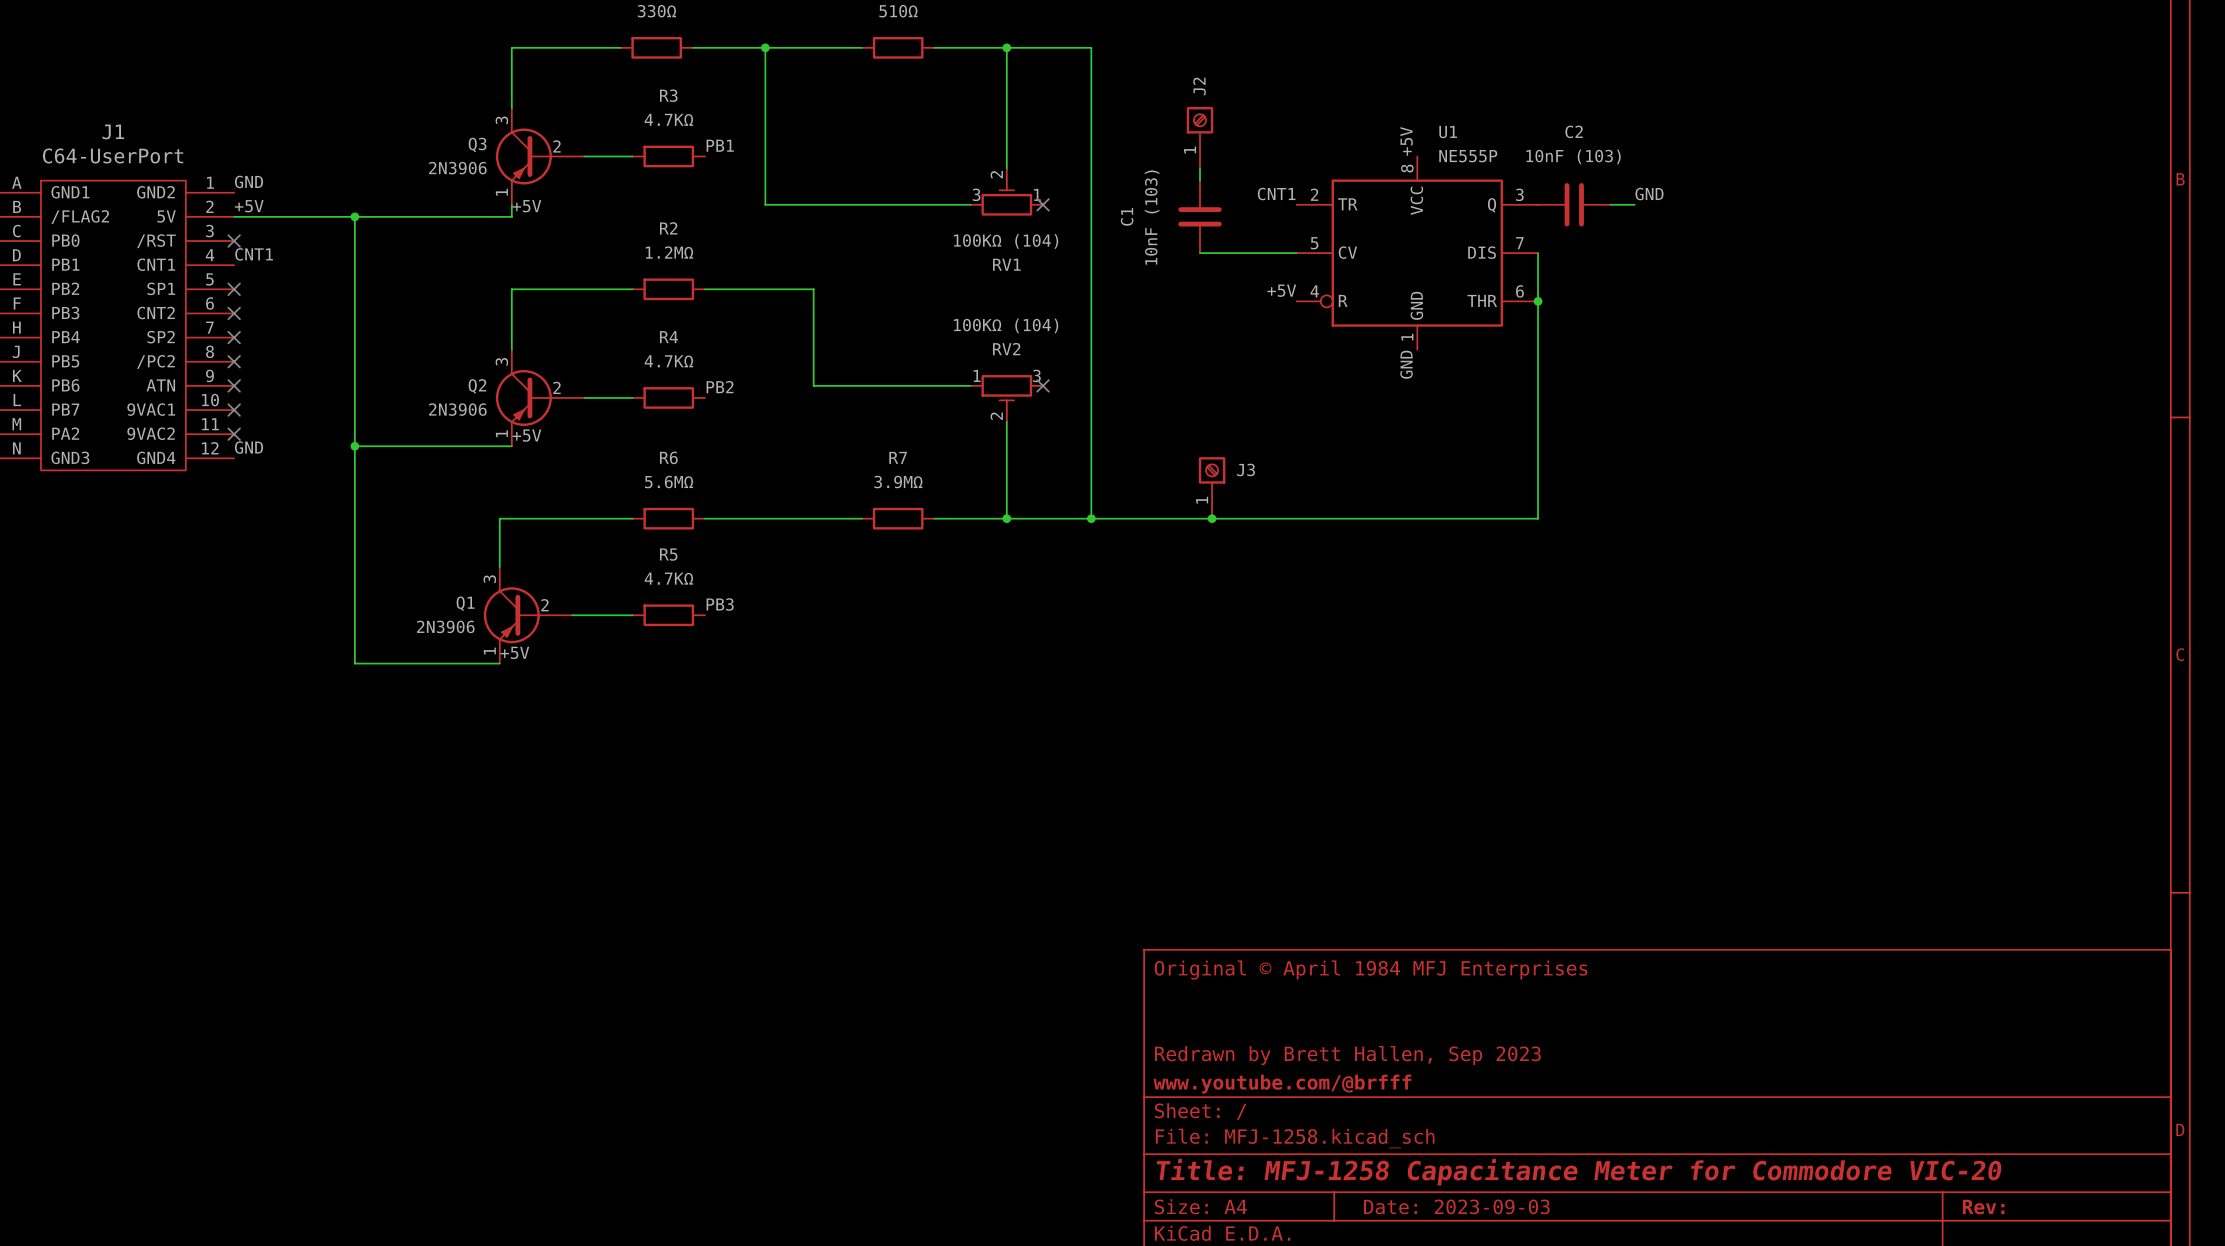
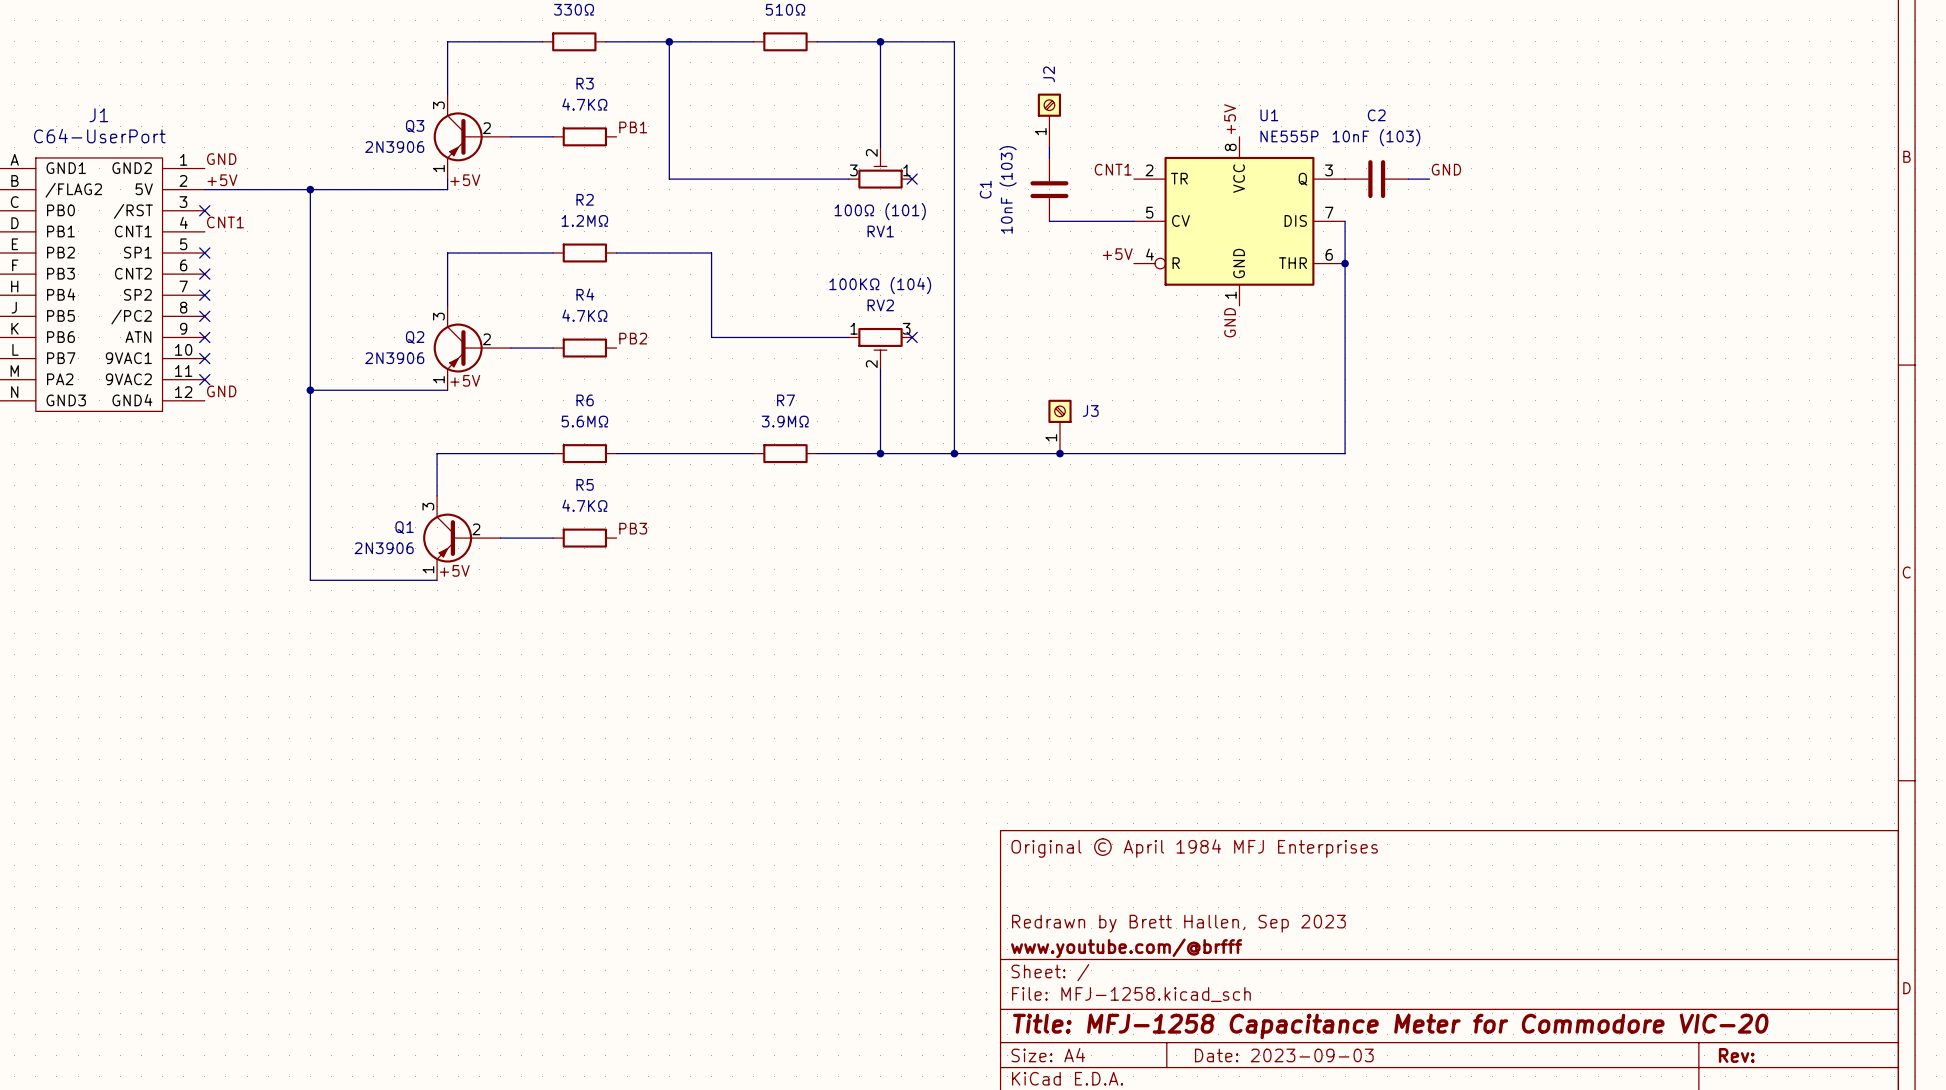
RV1 value: 100KΩ (104) (1006, 241) -> 100Ω (101) (880, 211)

